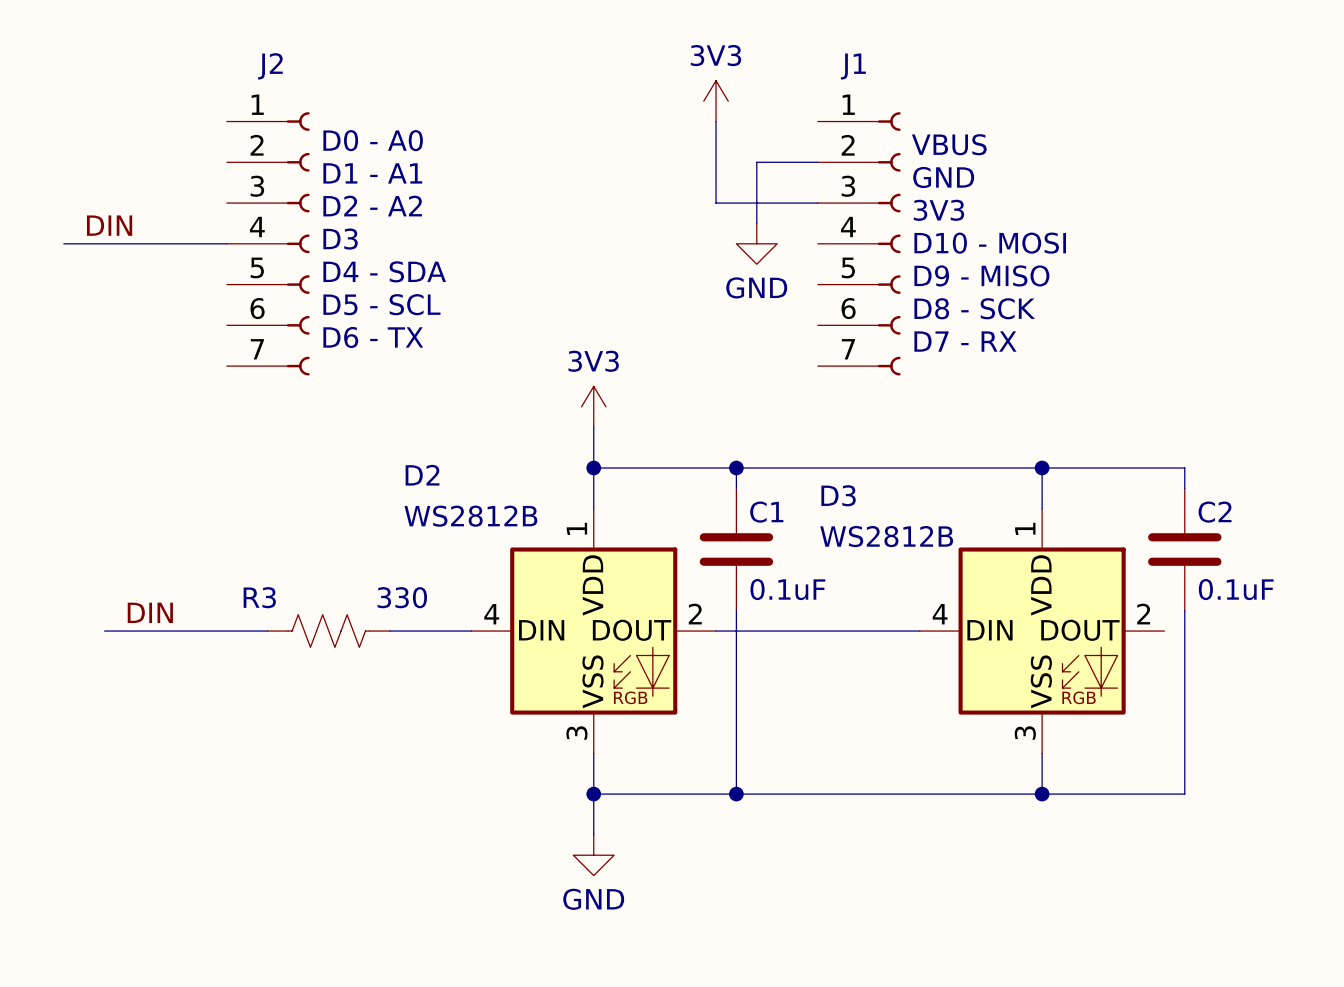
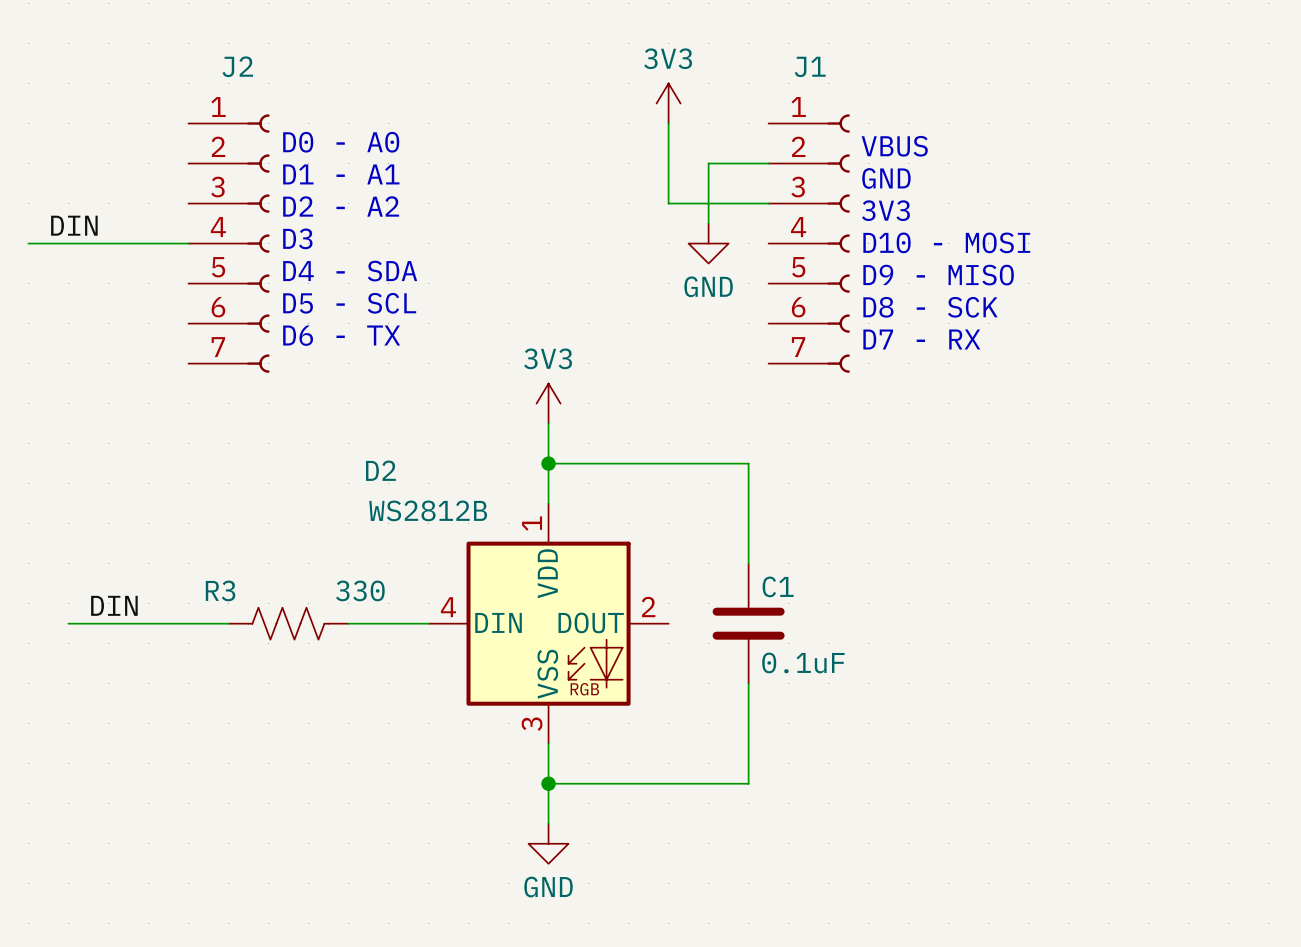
wire: (736, 468) (736, 488) -> none
junction: (736, 468) -> none
wire: (797, 468) (1184, 468) (1184, 488) -> (748, 463) (748, 563)
wire: (1042, 468) (1042, 508) -> none
junction: (1042, 468) -> none
C1 position: (736, 549) -> (748, 623)
C2: 0.1uF (1184, 549) -> none
wire: (736, 610) (736, 794) -> none
wire: (1184, 610) (1184, 794) (797, 794) -> (748, 683) (748, 783)
wire: (716, 631) (919, 631) -> none
D3: WS2812B (1042, 631) -> none
wire: (1042, 753) (1042, 794) -> none
junction: (736, 794) -> none
junction: (1042, 794) -> none

